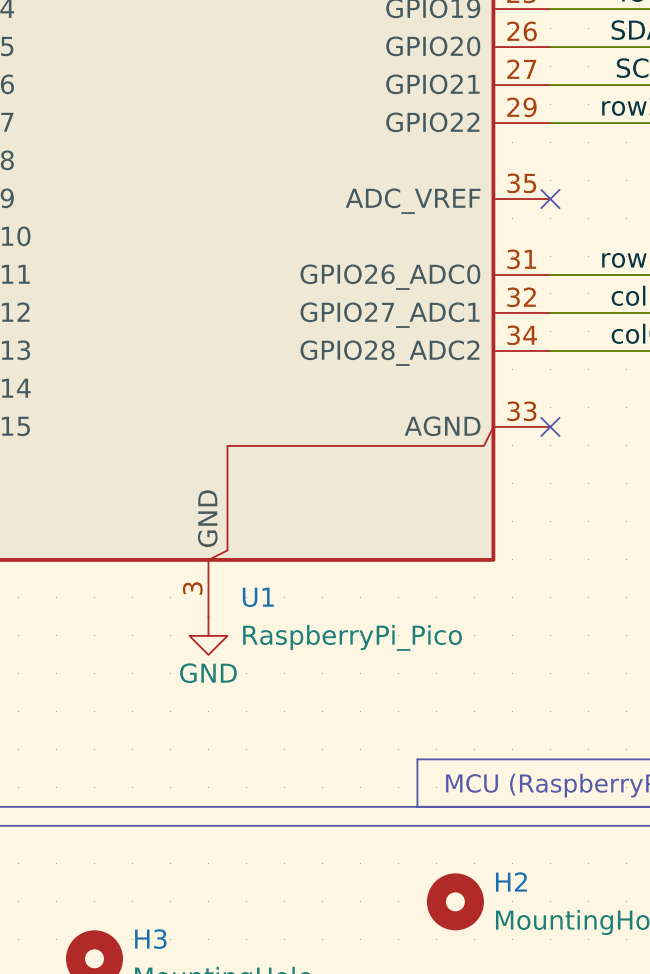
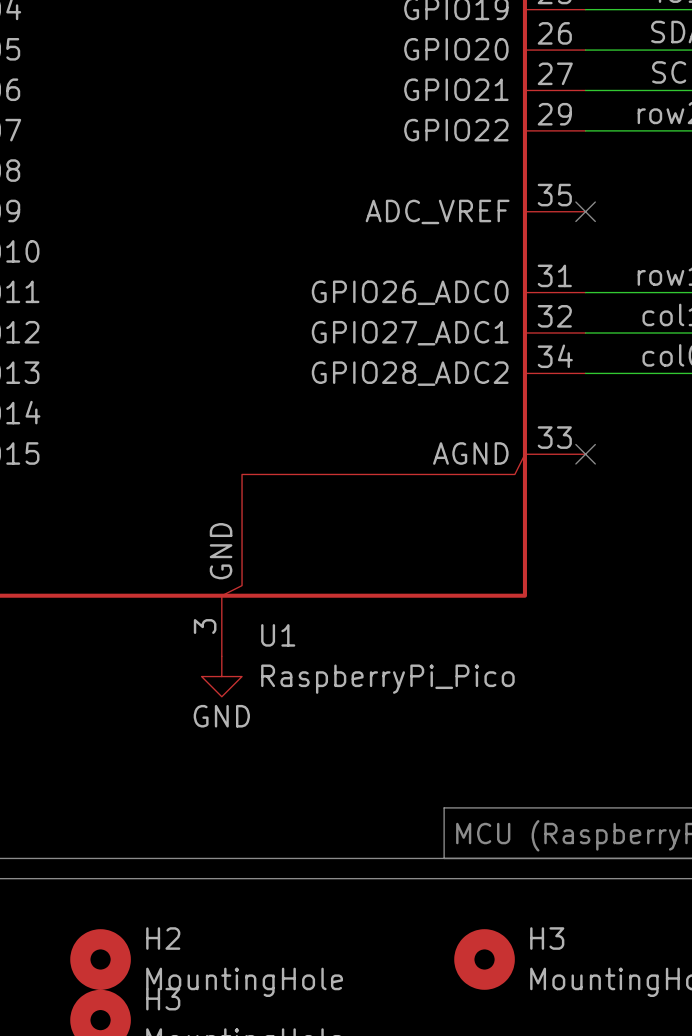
H2 name: H2 (511, 881) -> H3 (547, 938)
H2: none -> MountingHole (100, 959)

